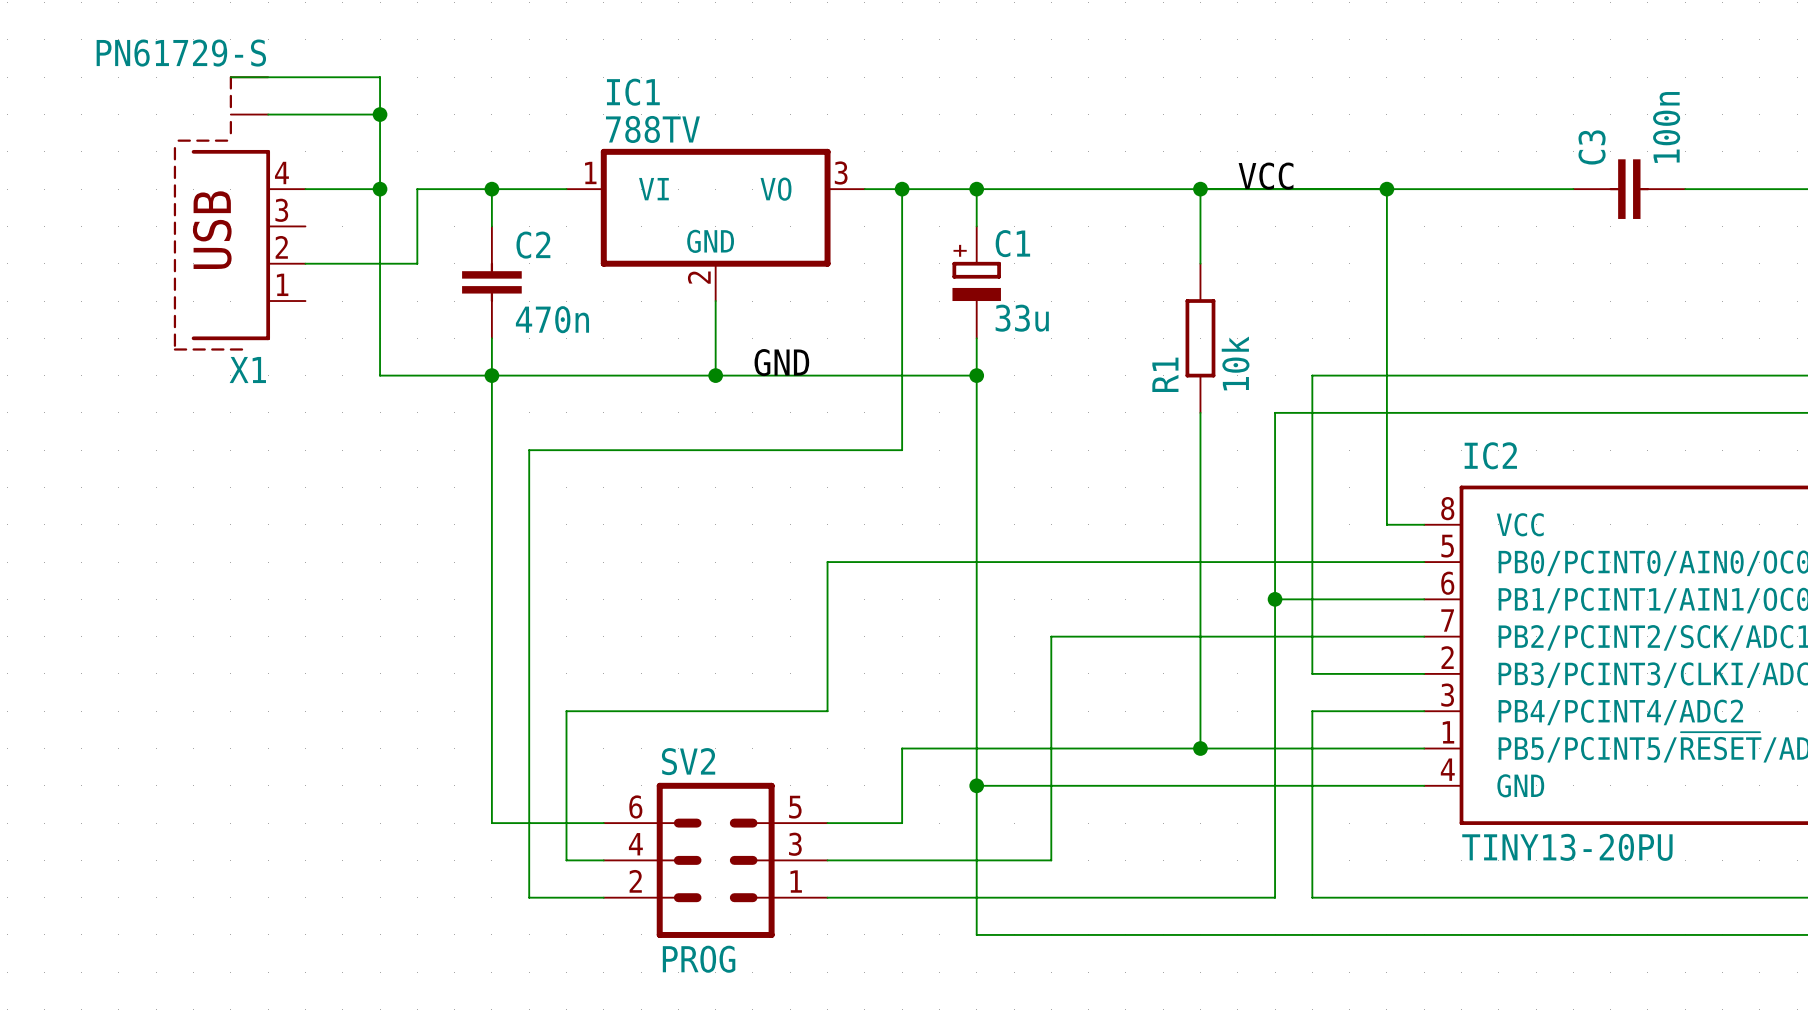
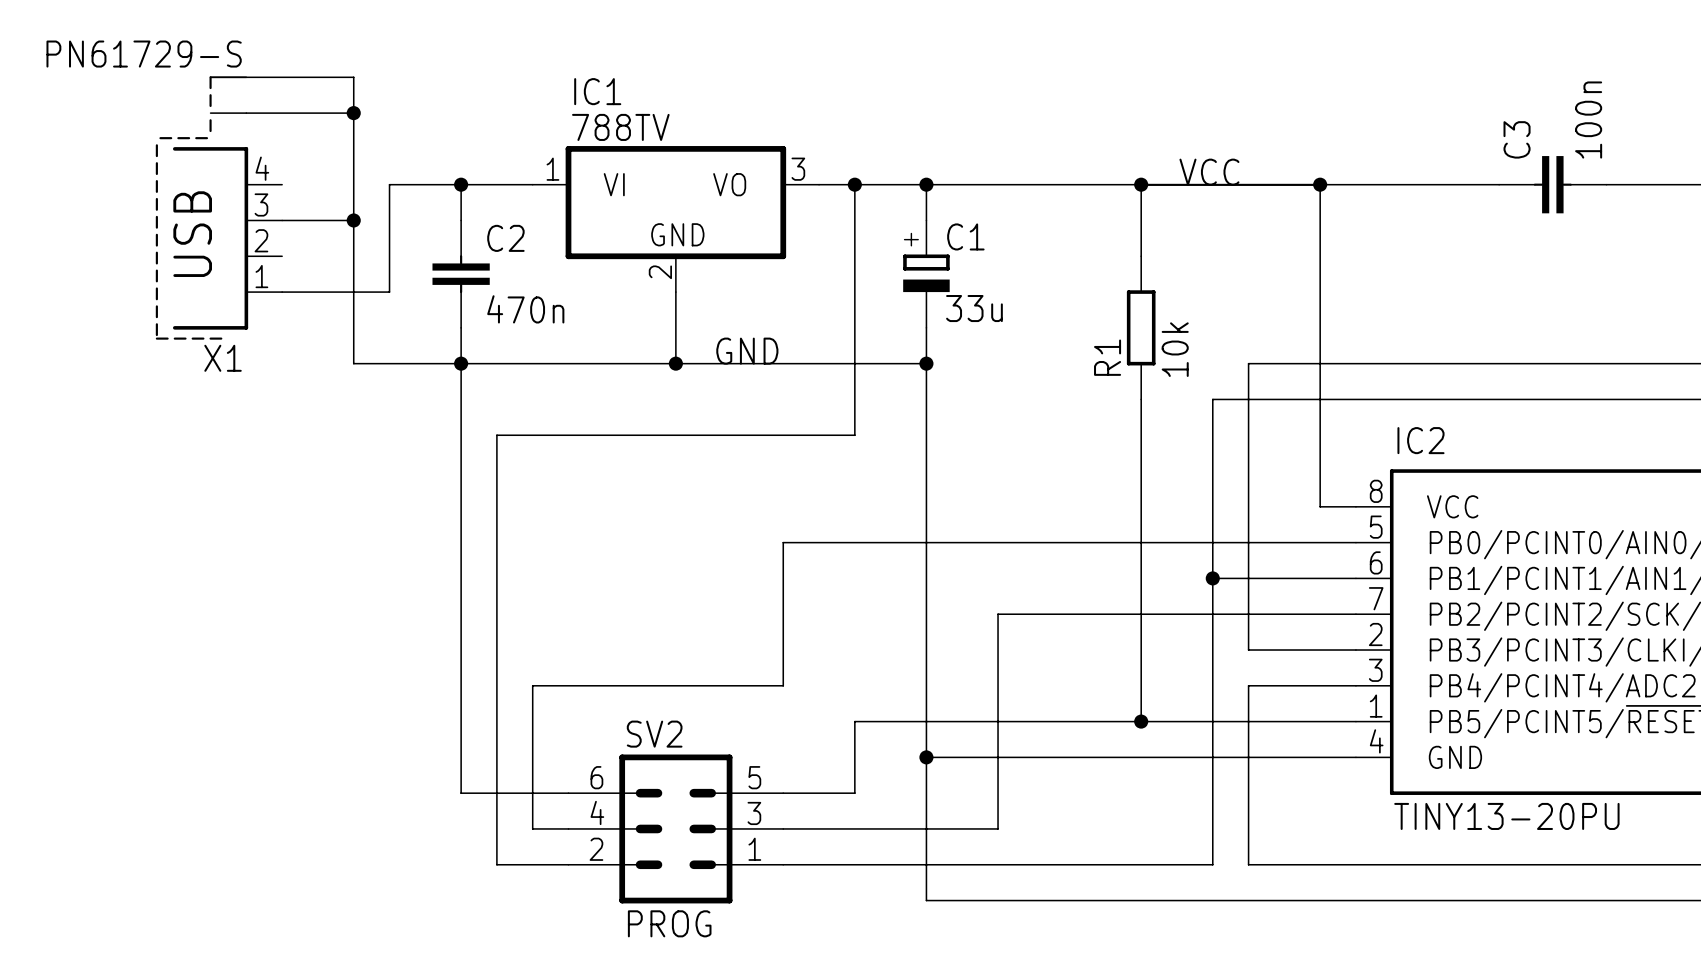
wire: (305, 189) (380, 189) -> (282, 220) (353, 220)
junction position: (380, 189) -> (353, 220)
wire: (305, 263) (417, 263) -> (282, 292) (389, 292) (389, 256)

